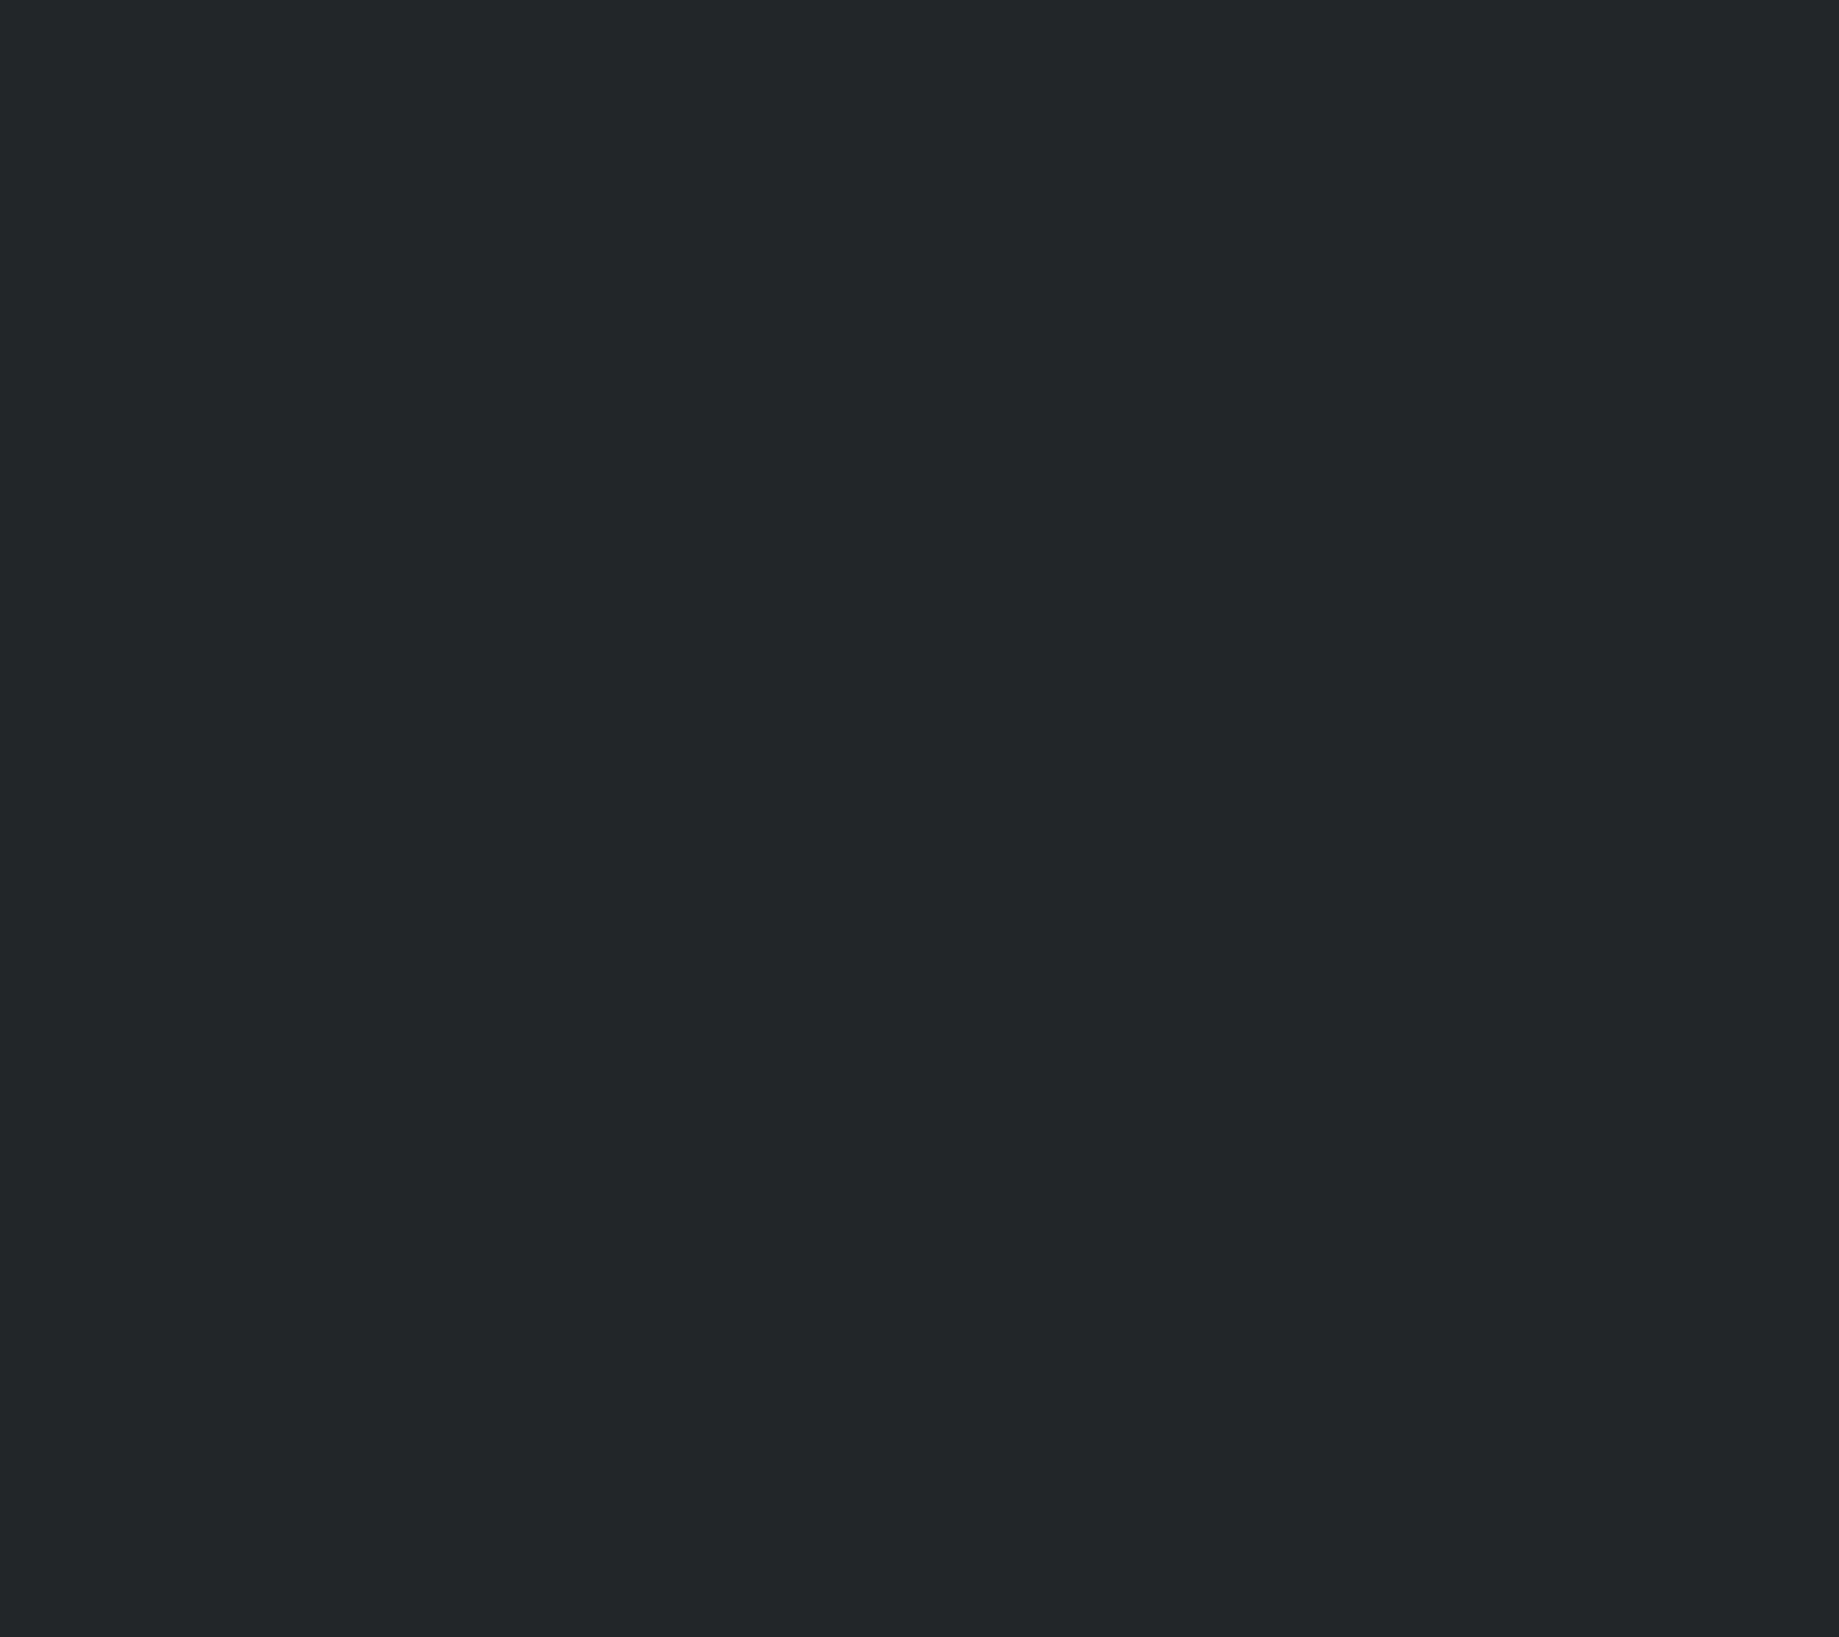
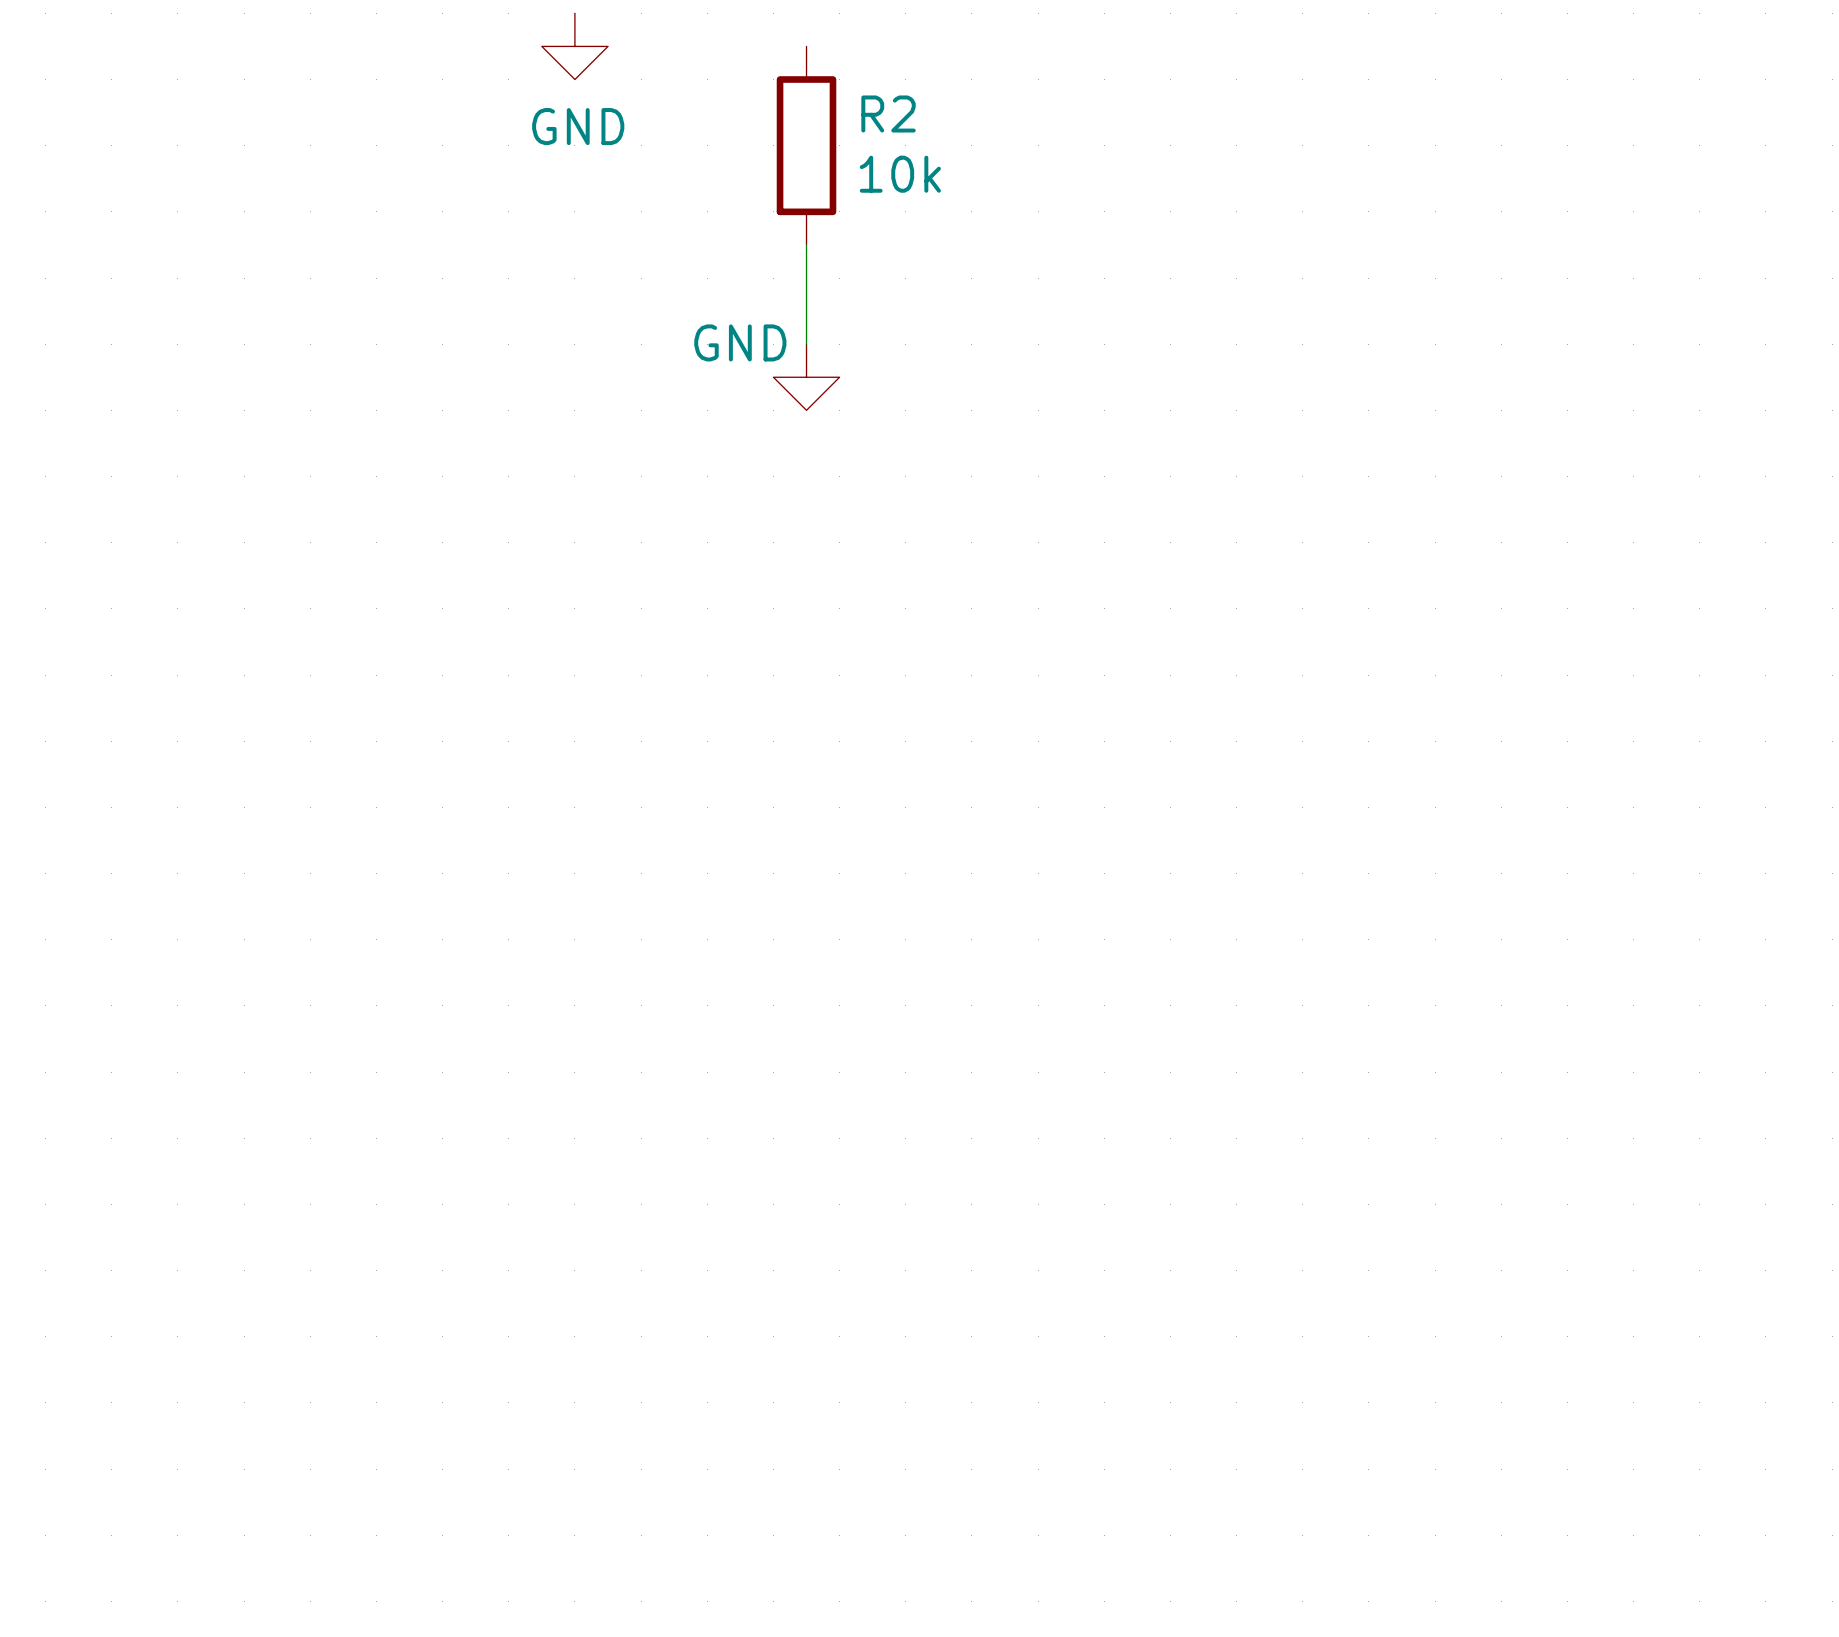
power symbol: none -> GND (574, 46)
R2: none -> 10k (806, 145)
wire: none -> (806, 244) (806, 344)
power symbol: none -> GND (806, 377)

